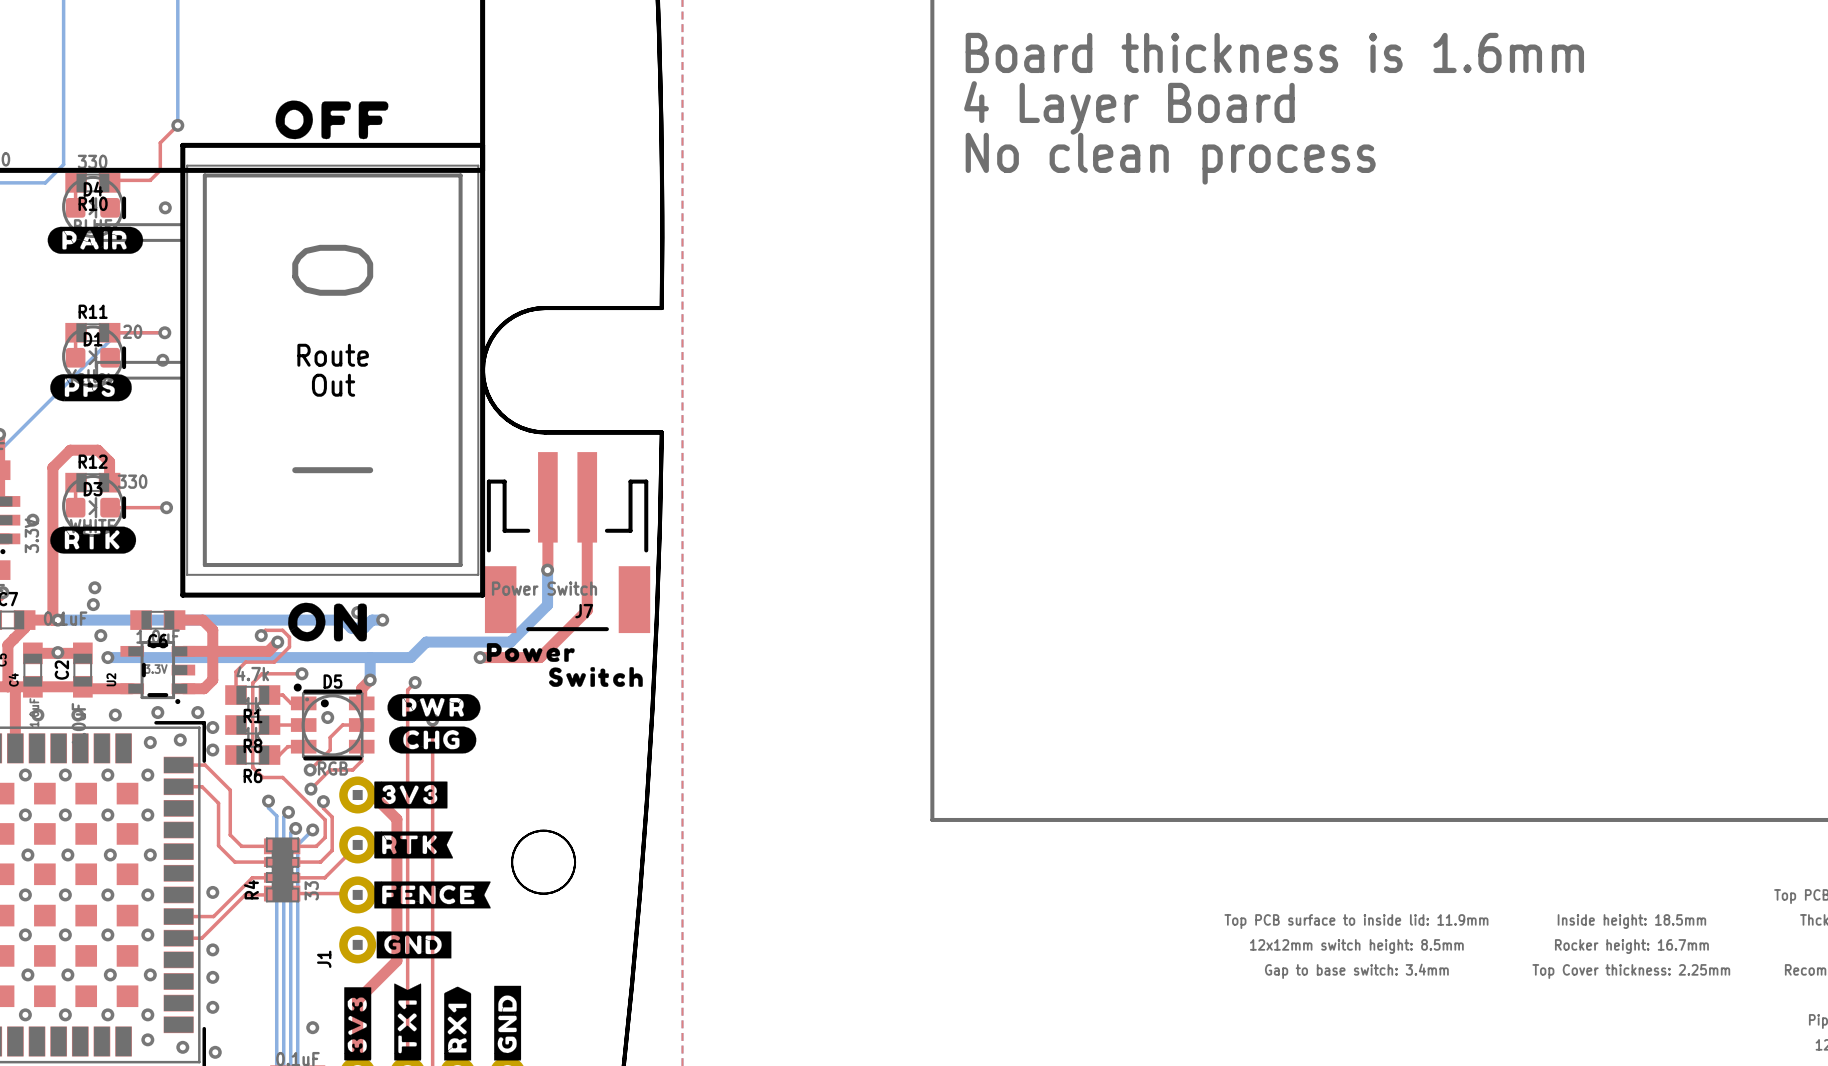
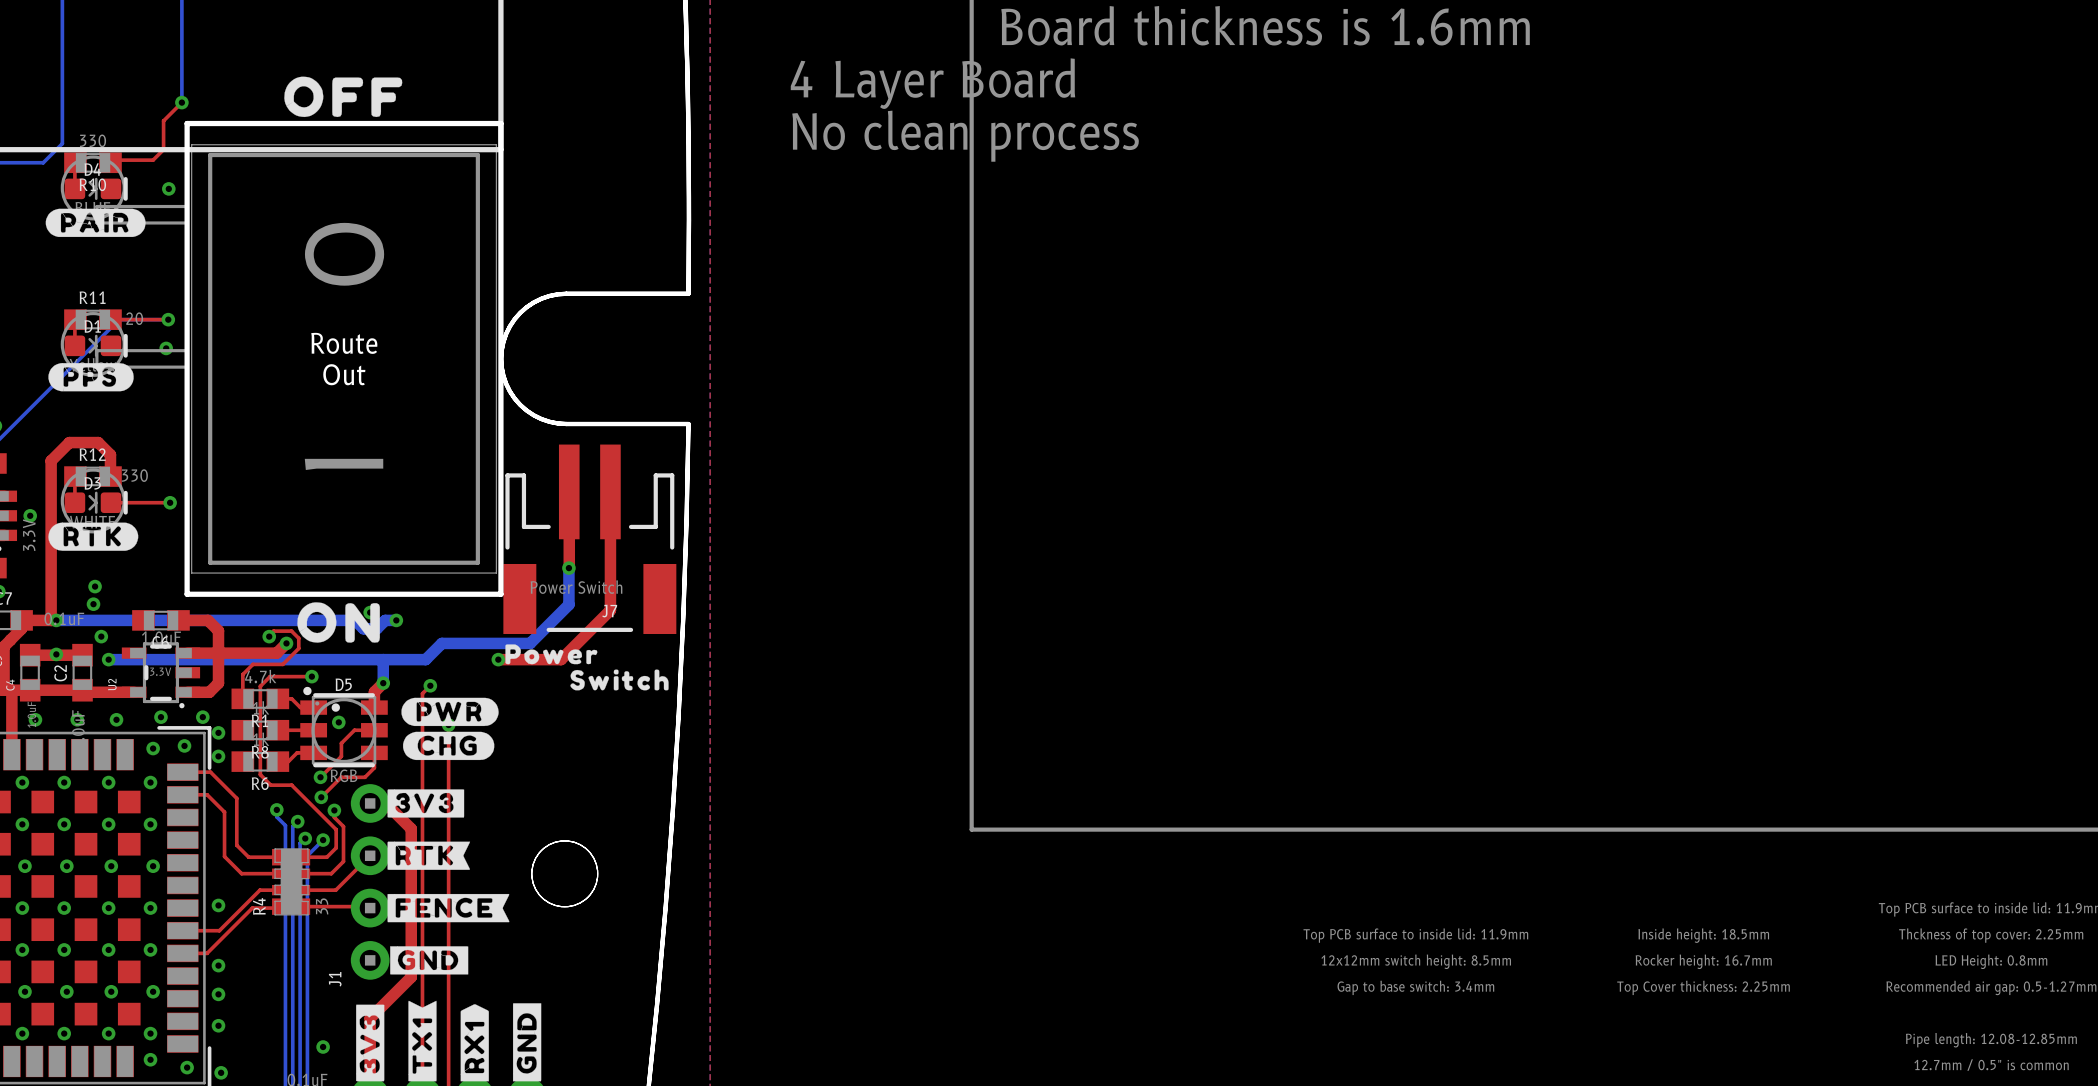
text position: 4 Layer Board (1129, 107) -> 4 Layer Board (932, 83)
text position: No clean process (1170, 158) -> No clean process (965, 136)

